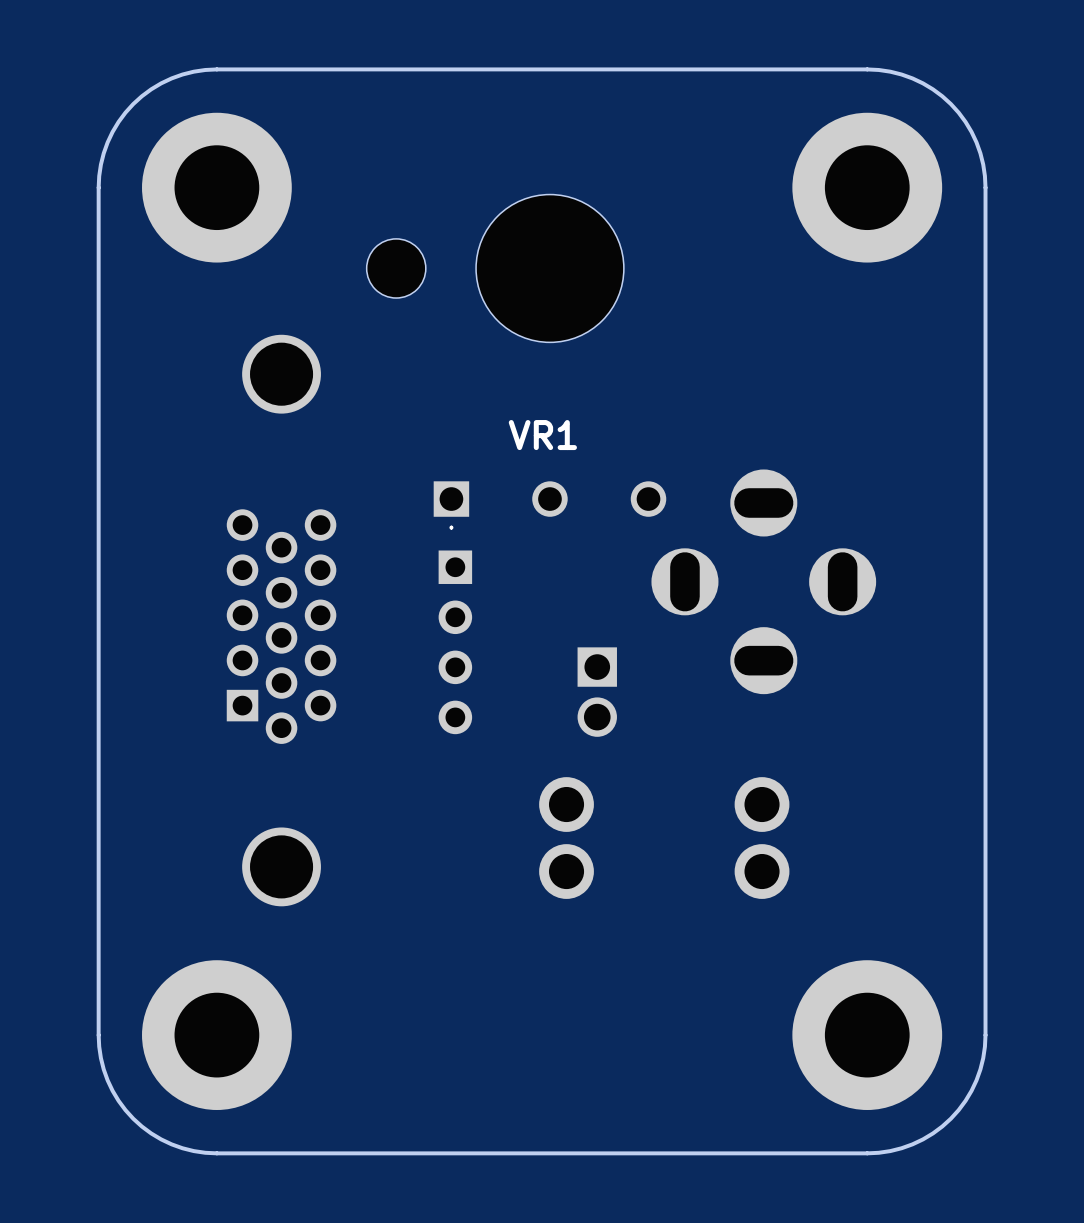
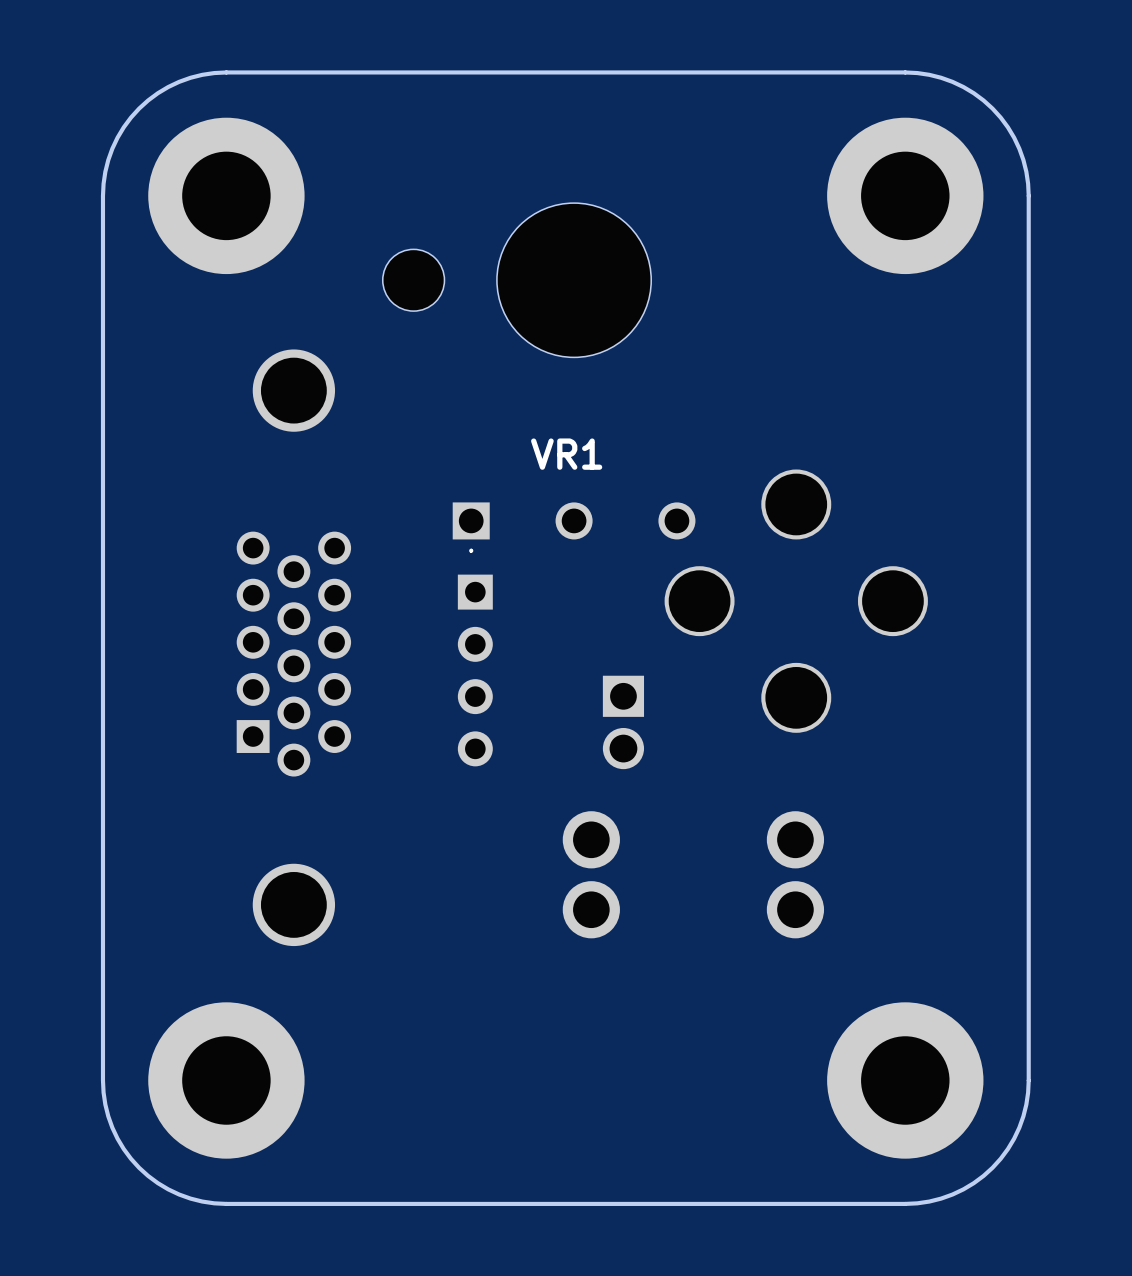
part footprint: [651, 469, 877, 695] -> [664, 469, 928, 733]

